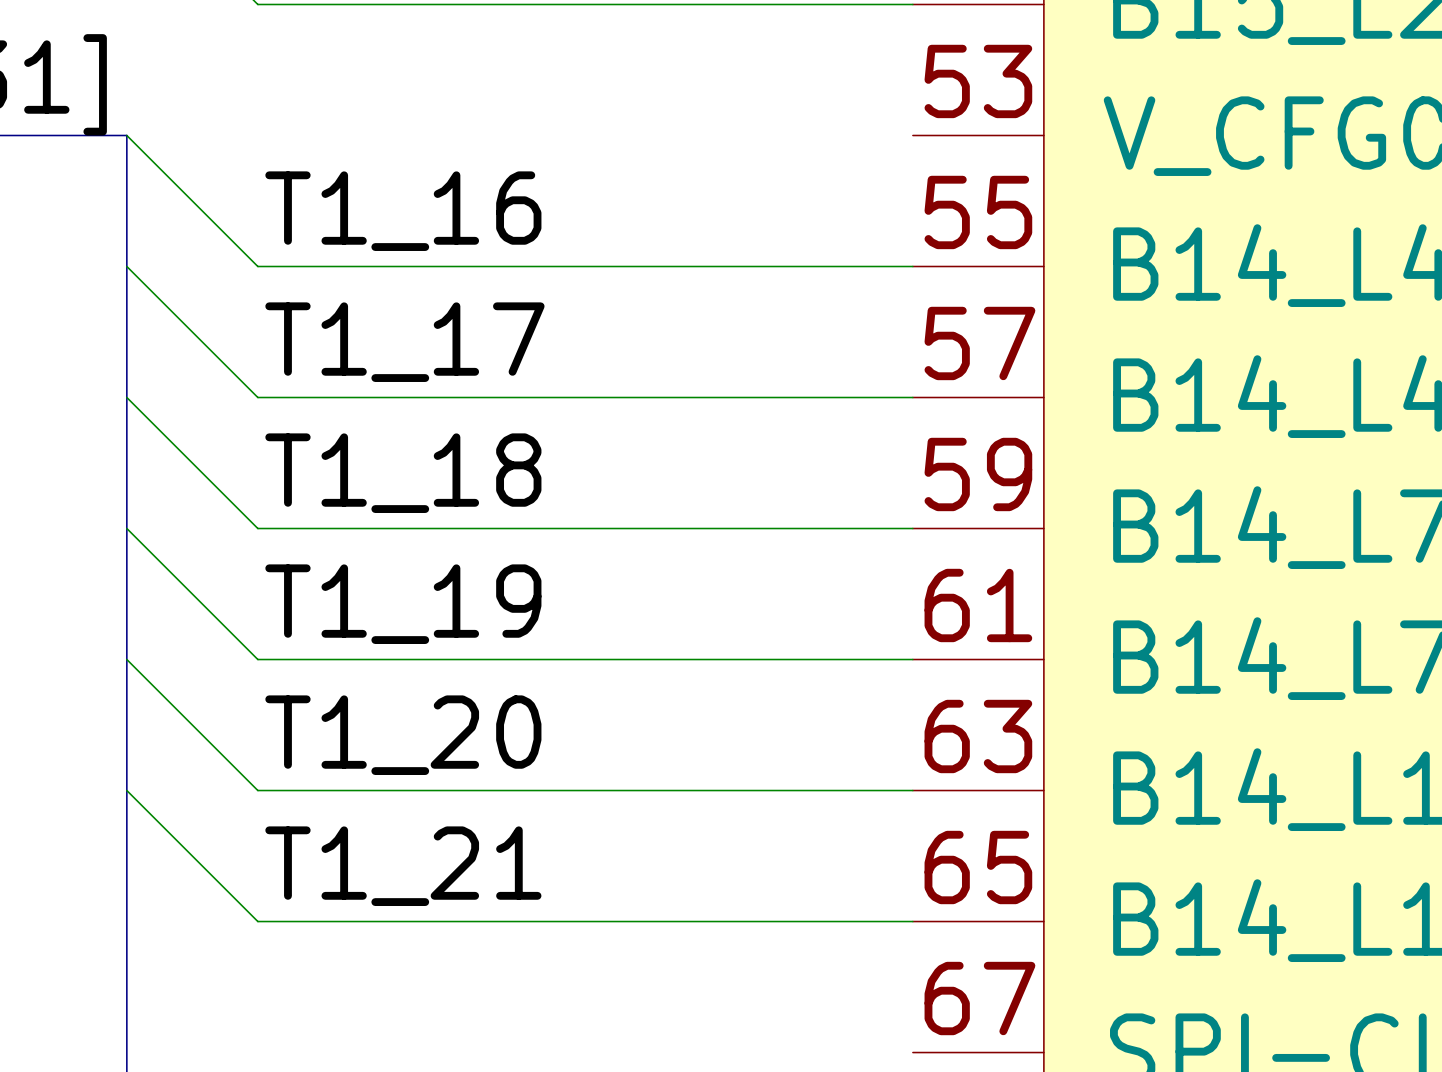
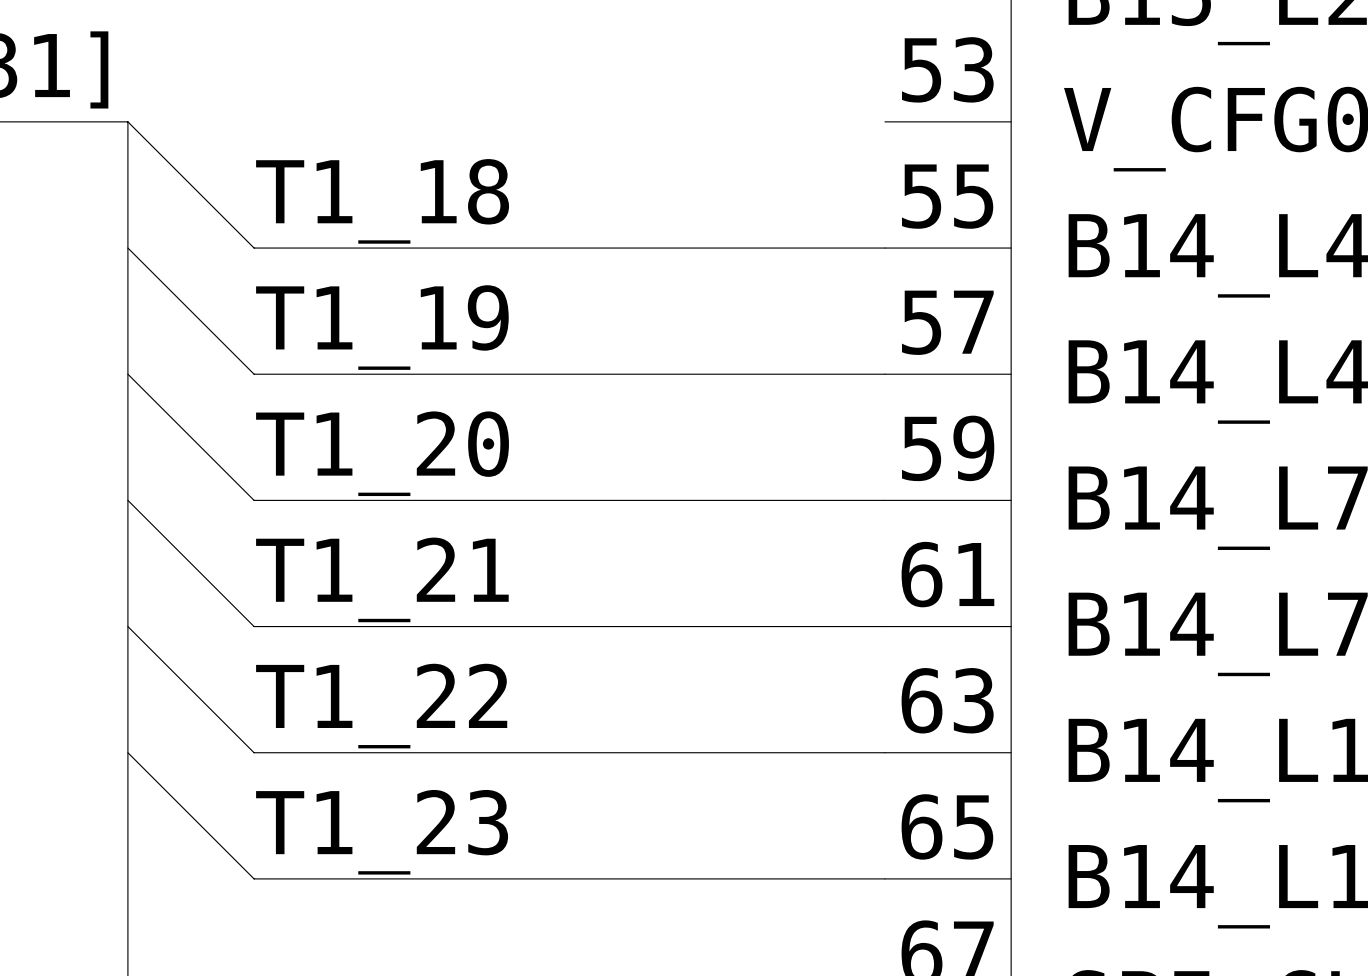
label: T1_16 (403, 211) -> T1_18 (382, 201)
label: T1_17 (404, 342) -> T1_19 (382, 327)
label: T1_18 (403, 473) -> T1_20 (382, 453)
label: T1_19 (403, 604) -> T1_21 (382, 579)
label: T1_20 (403, 735) -> T1_22 (381, 706)
label: T1_21 (403, 866) -> T1_23 (382, 832)

